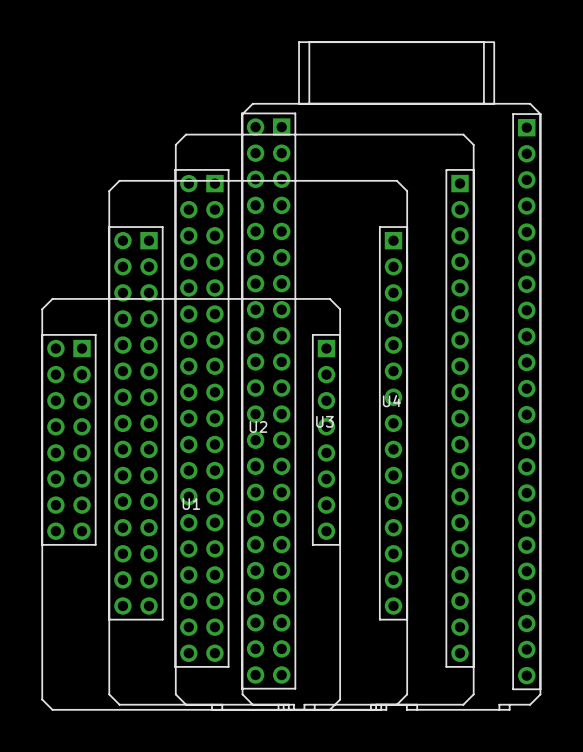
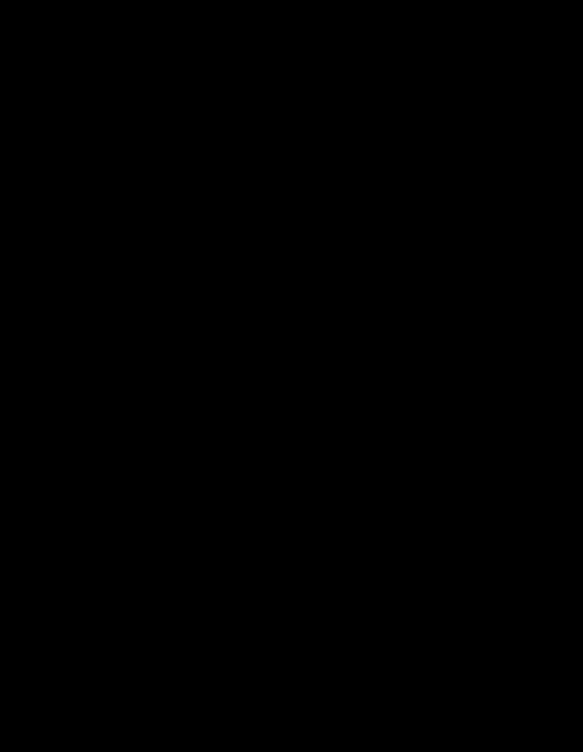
U4: (391, 375) -> none
U3: (324, 422) -> none
U2: (258, 445) -> none
U1: (191, 504) -> none

